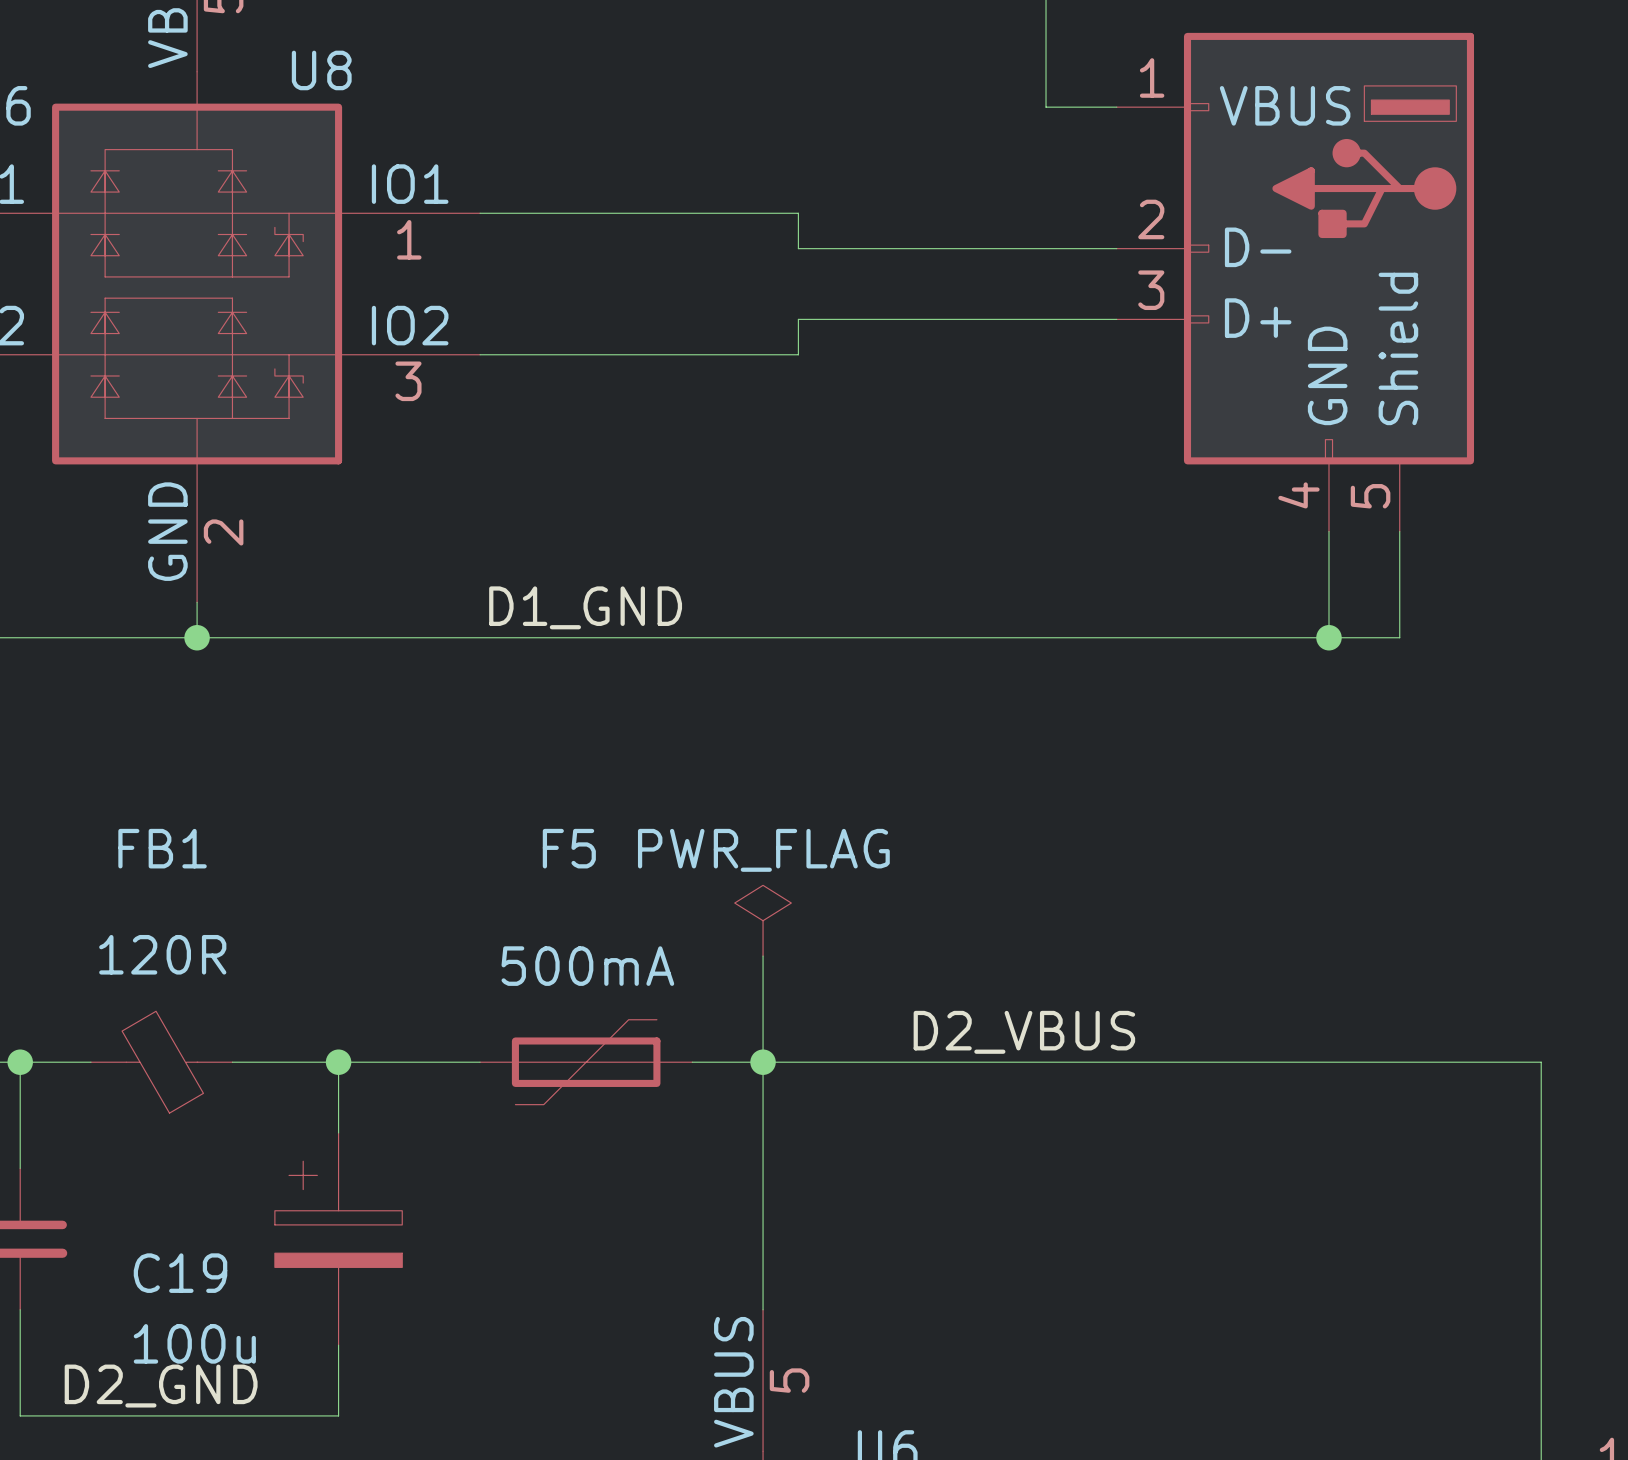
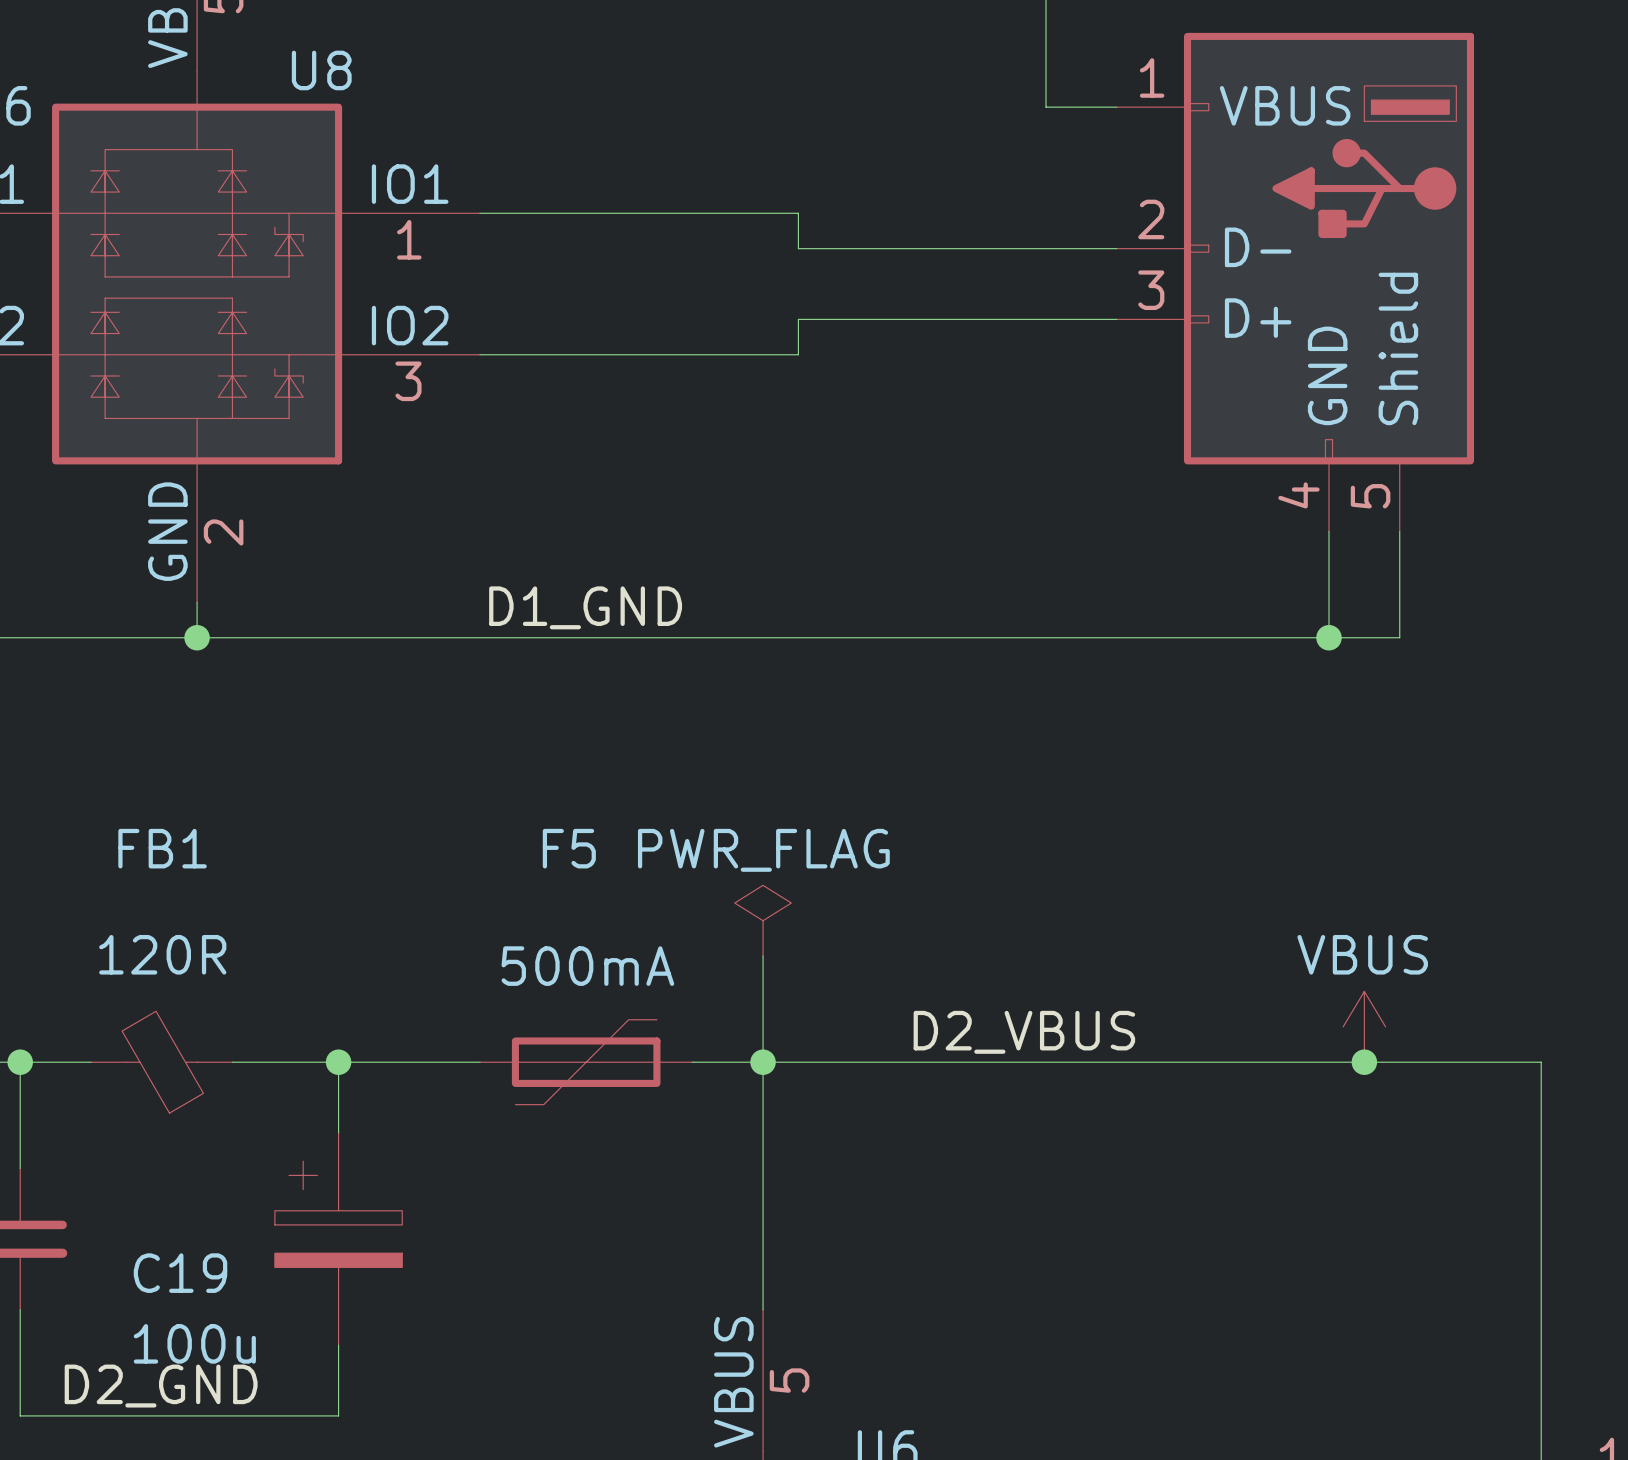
power symbol: none -> VBUS (1364, 1026)
junction: none -> (1364, 1062)

